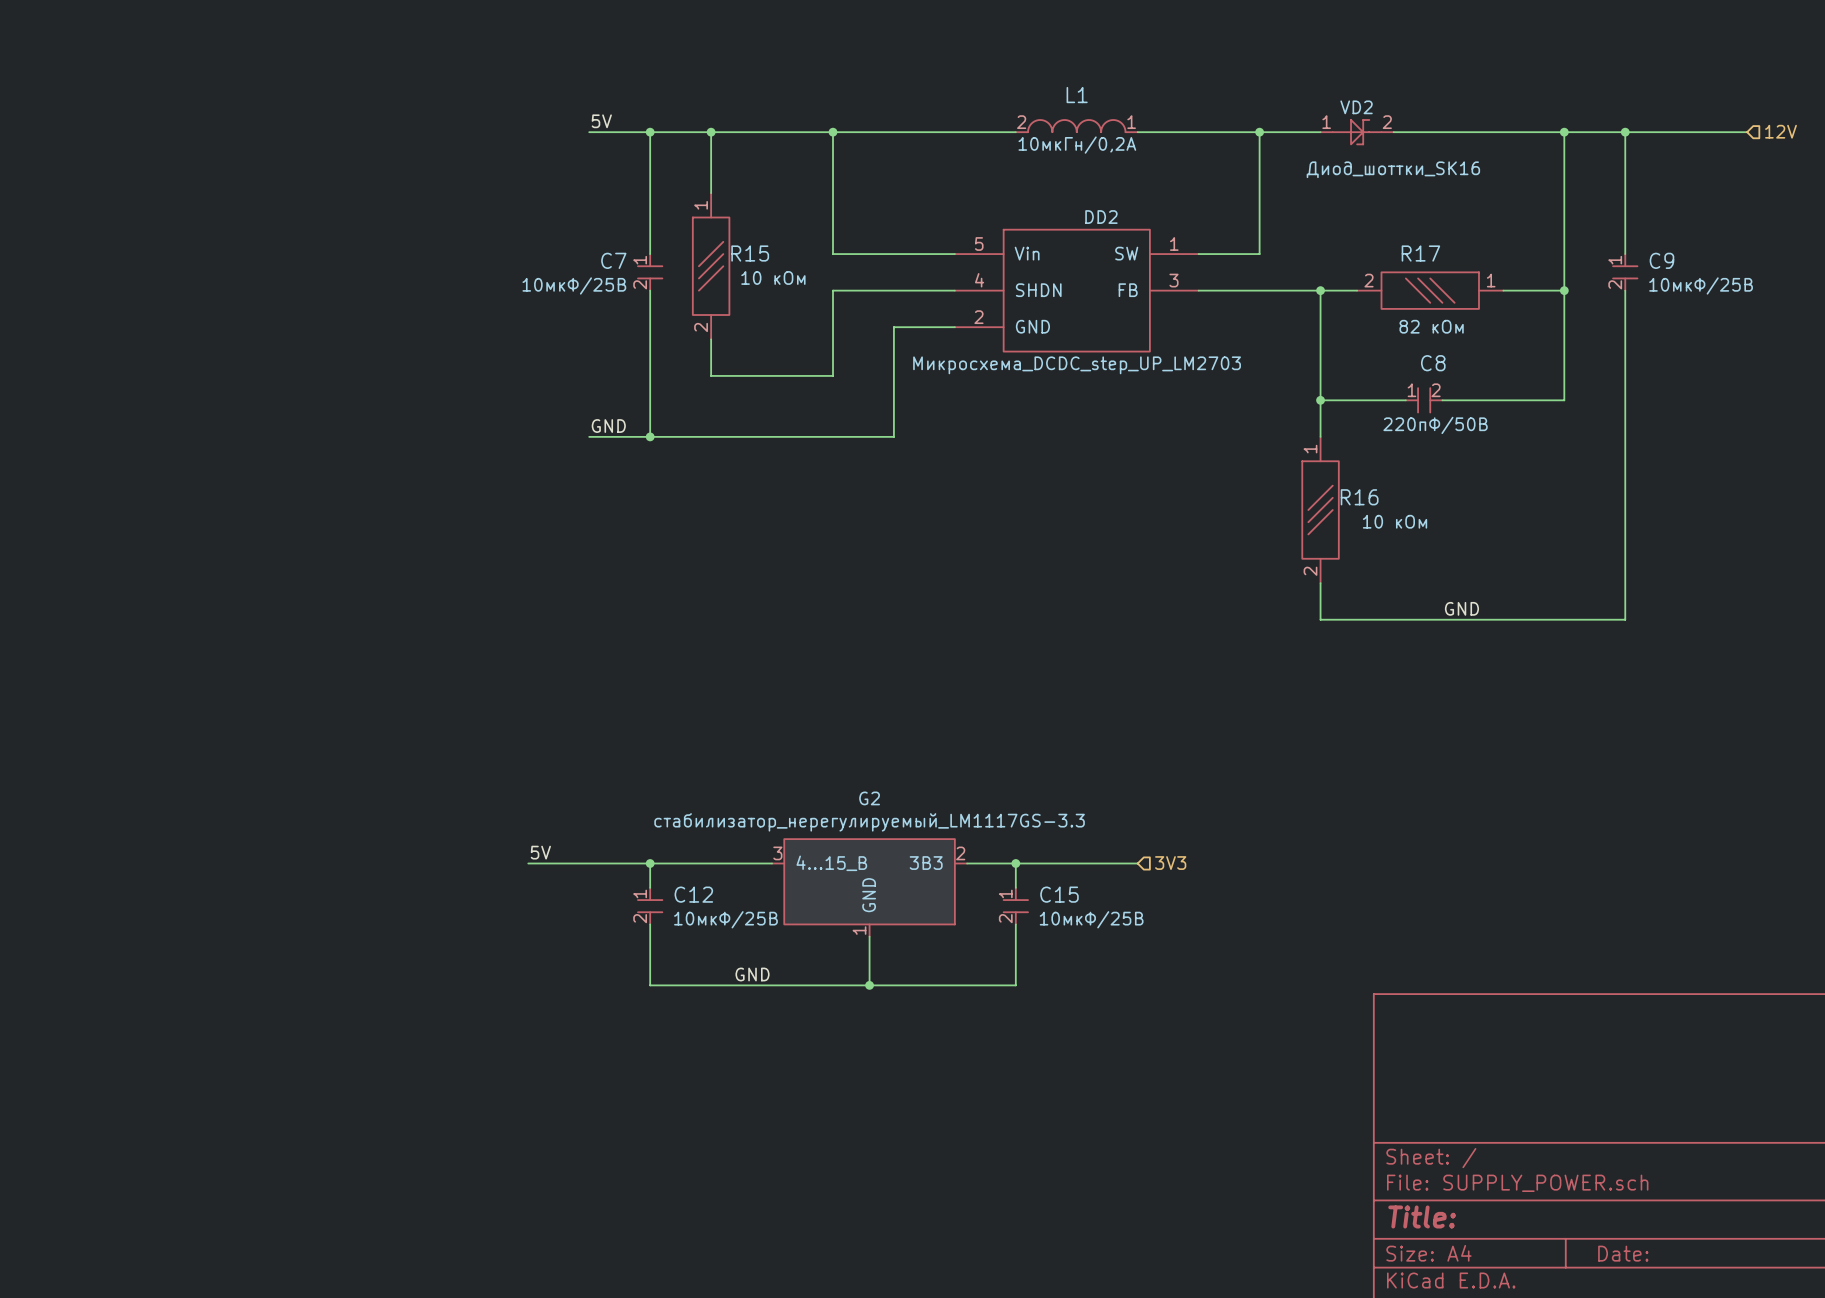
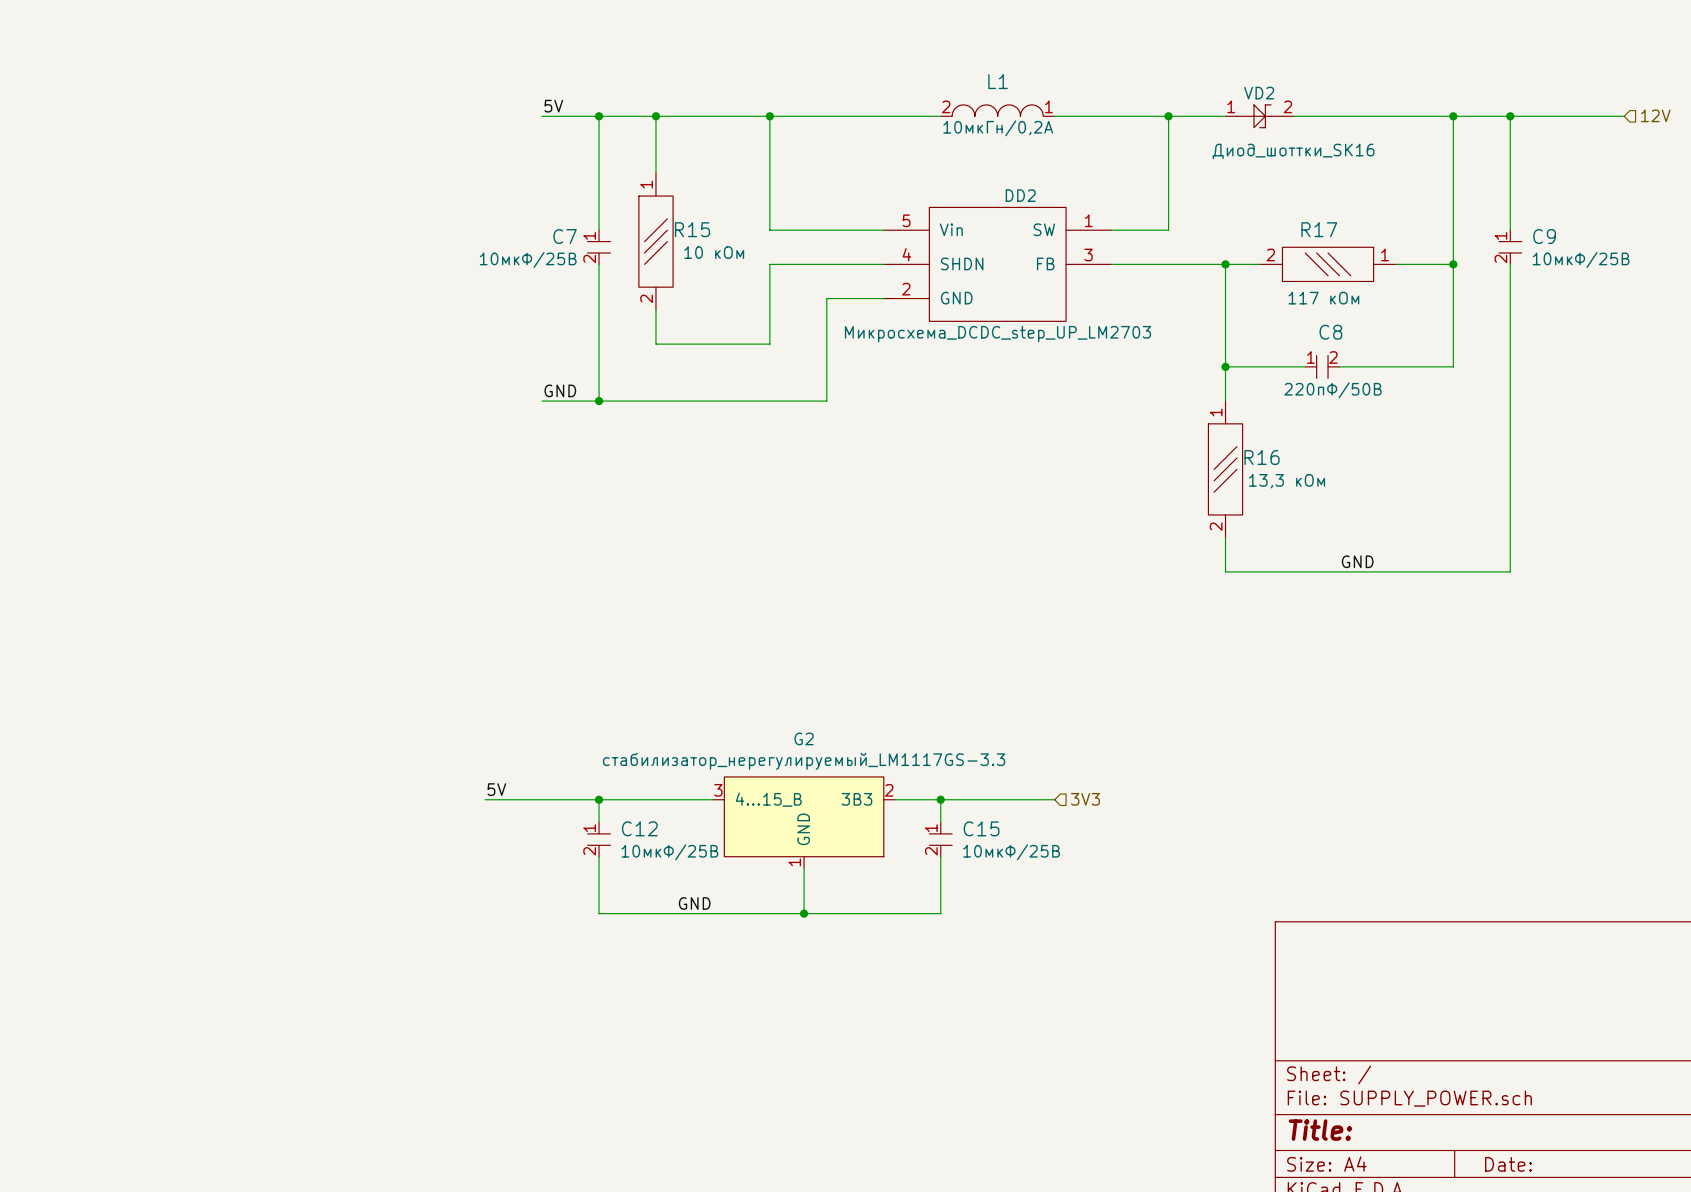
R17 text: 82 кОм (1431, 326) -> 117 кОм (1323, 298)
R16 text: 10 кОм (1395, 521) -> 13,3 кОм (1287, 481)

